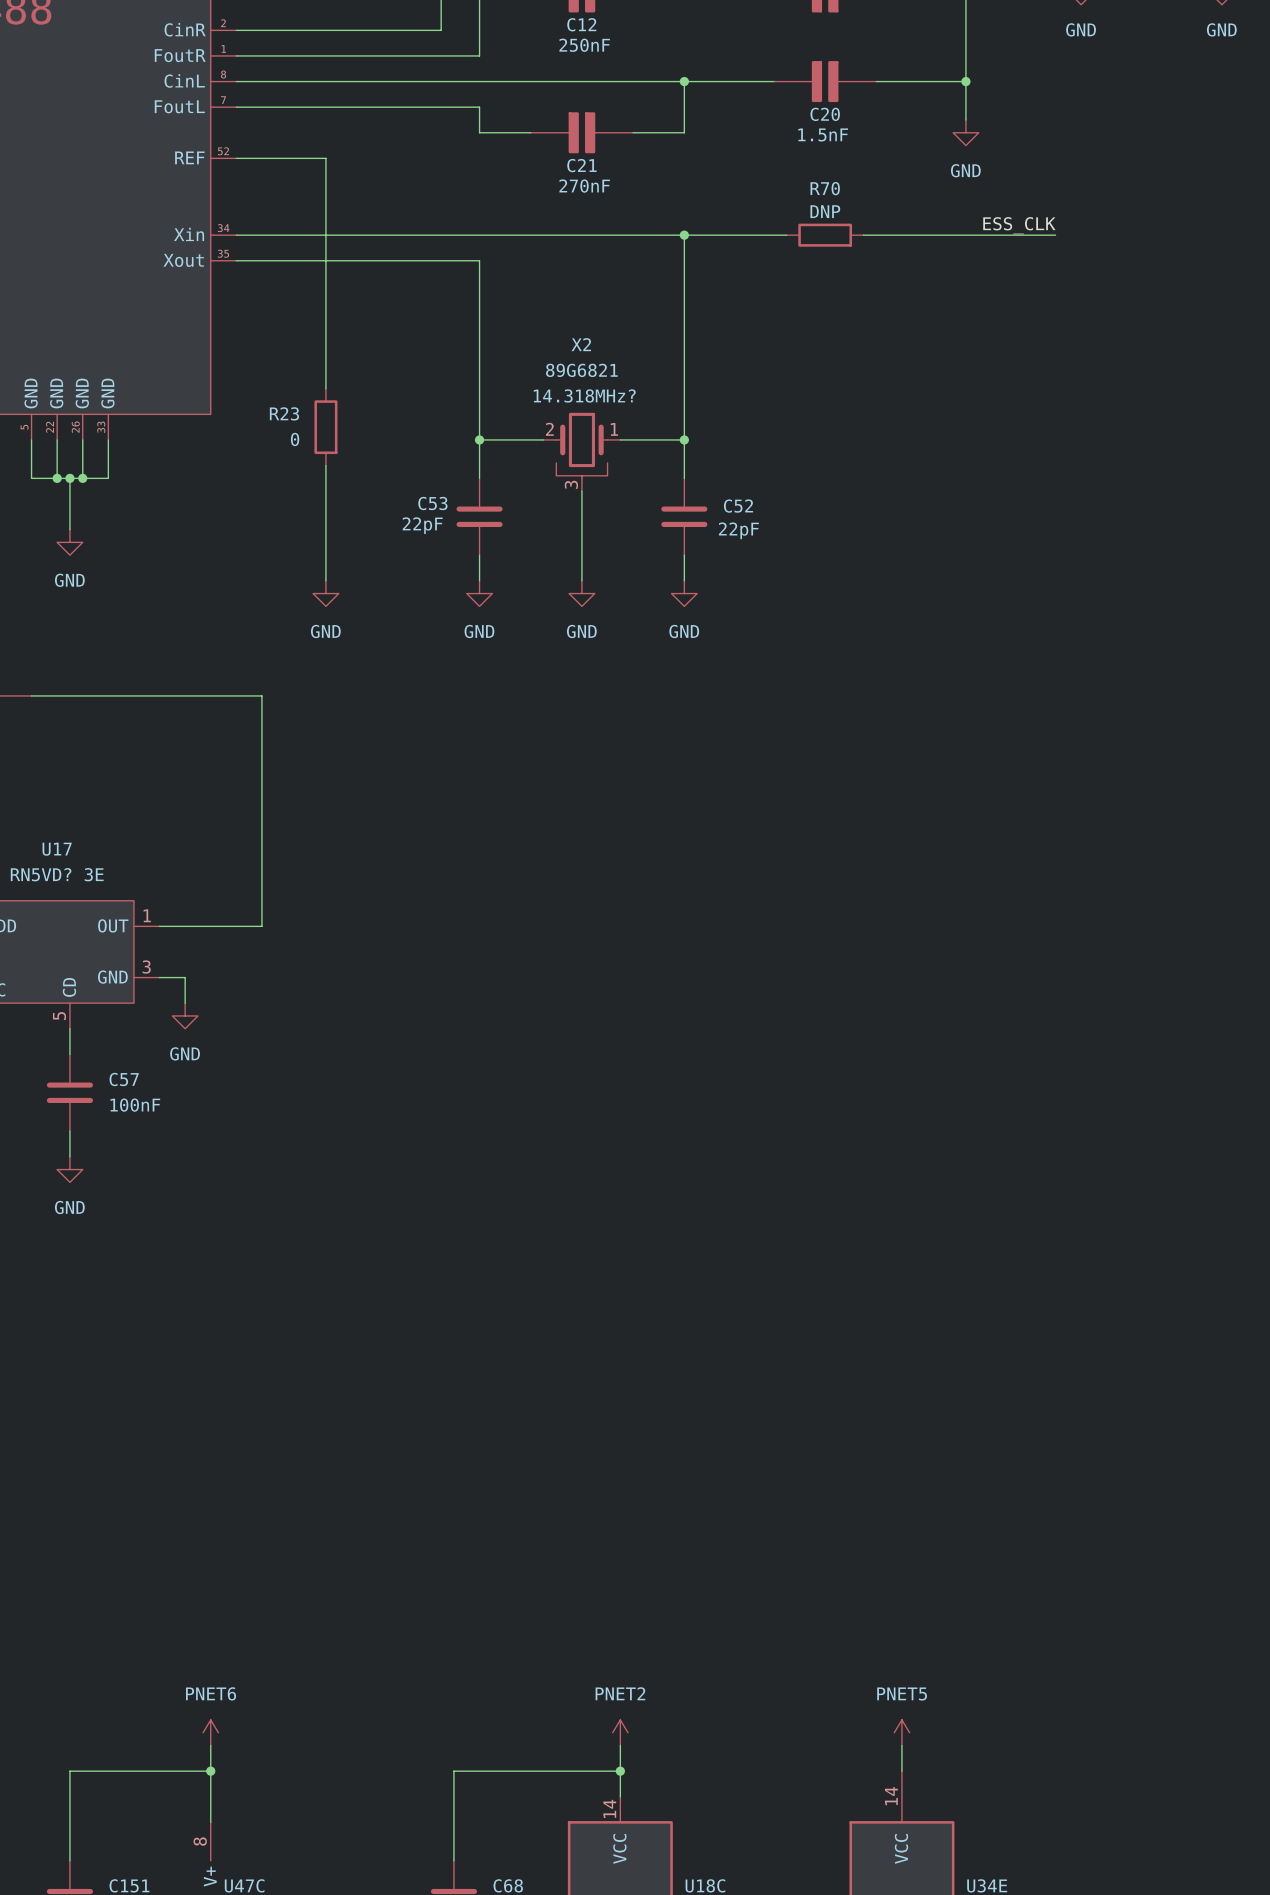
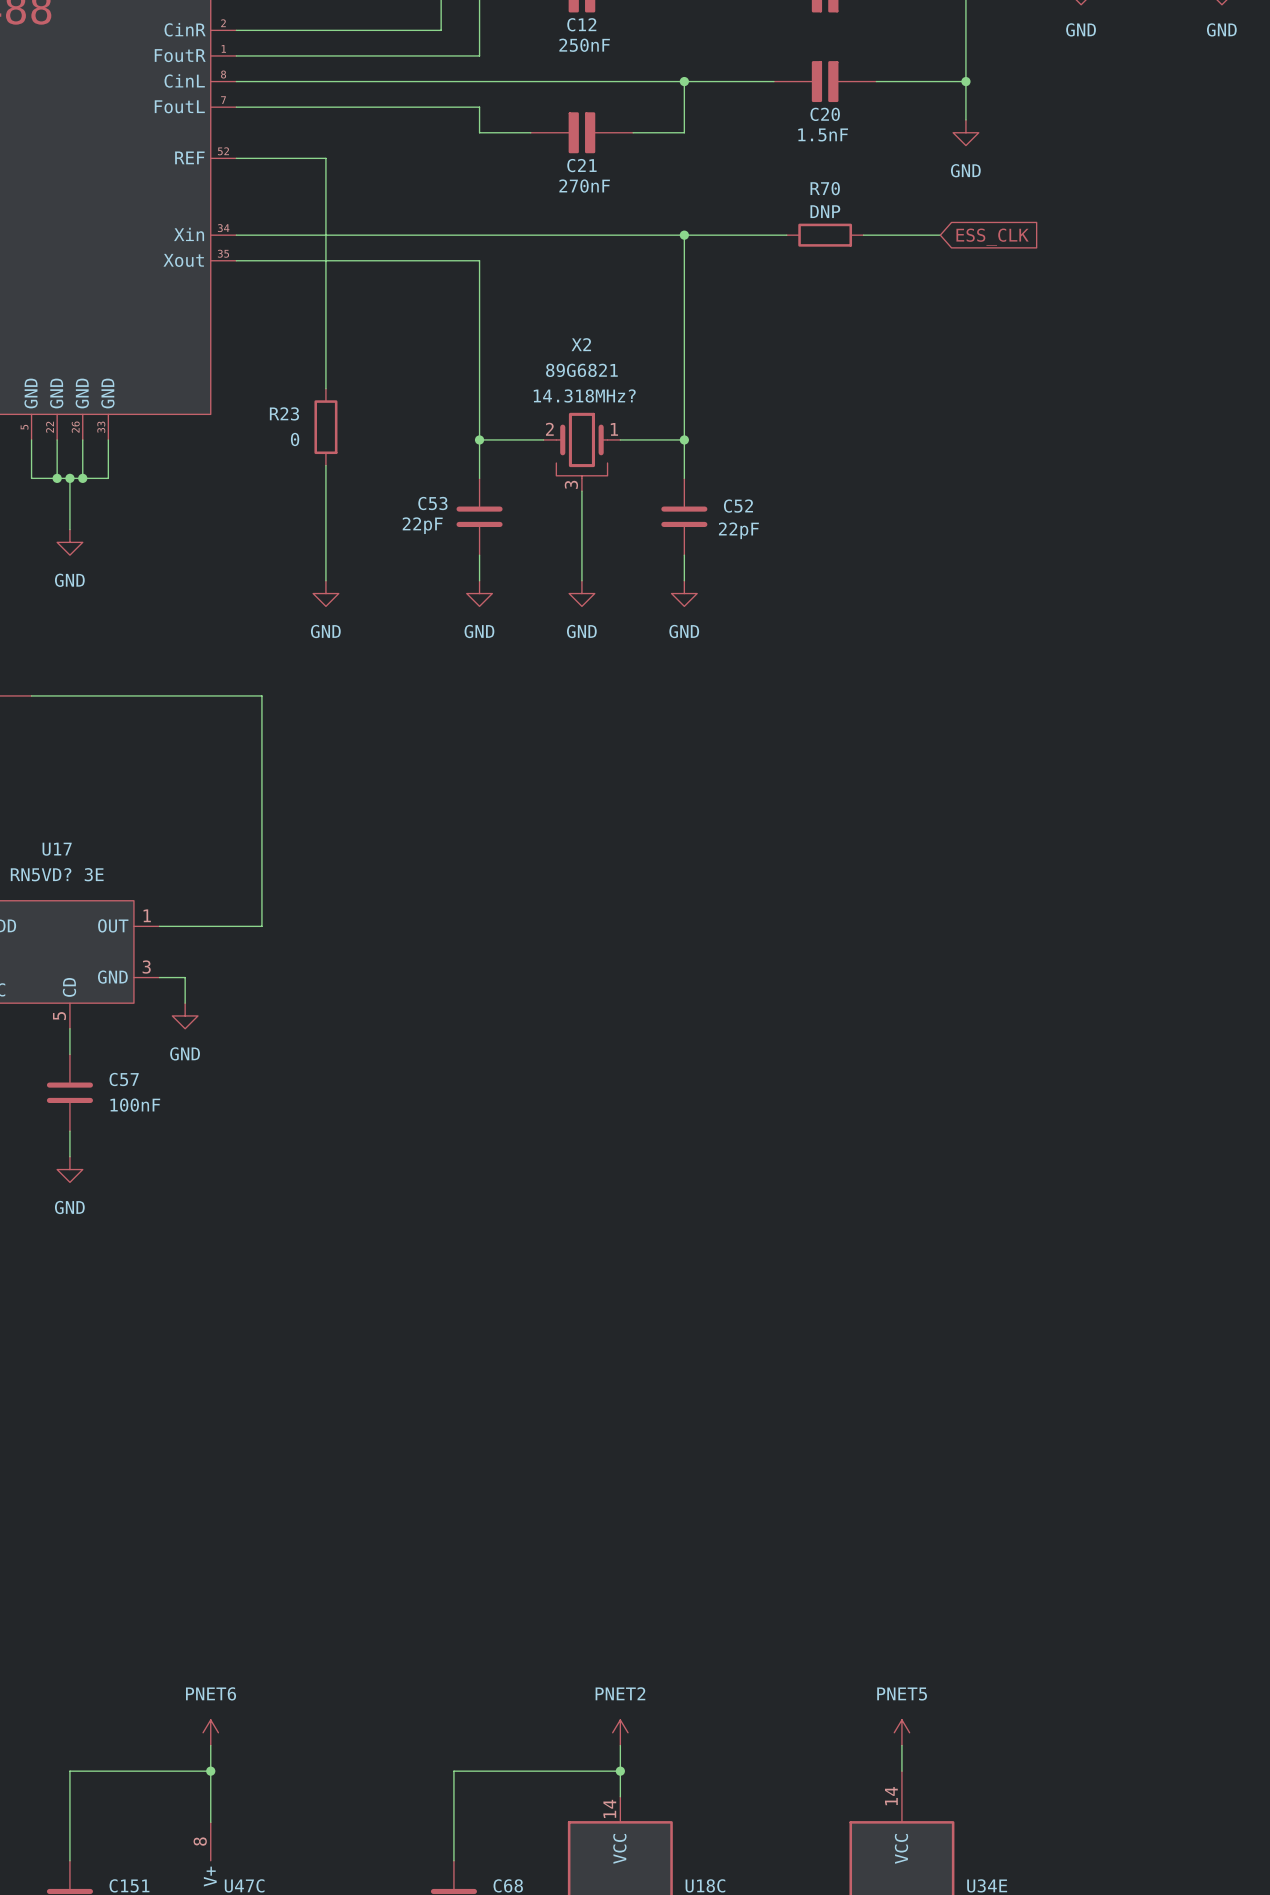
label: ESS_CLK (1019, 225) -> none
wire: (940, 235) (1055, 235) -> none
global label: none -> ESS_CLK (992, 237)

